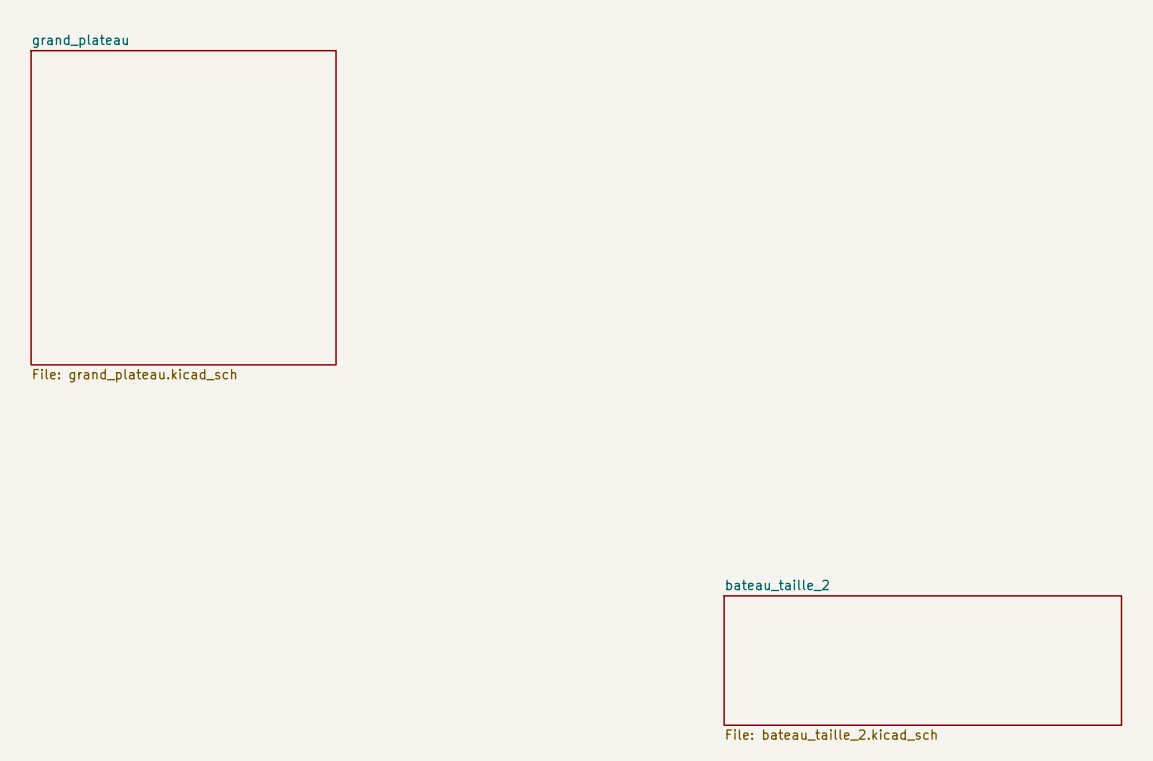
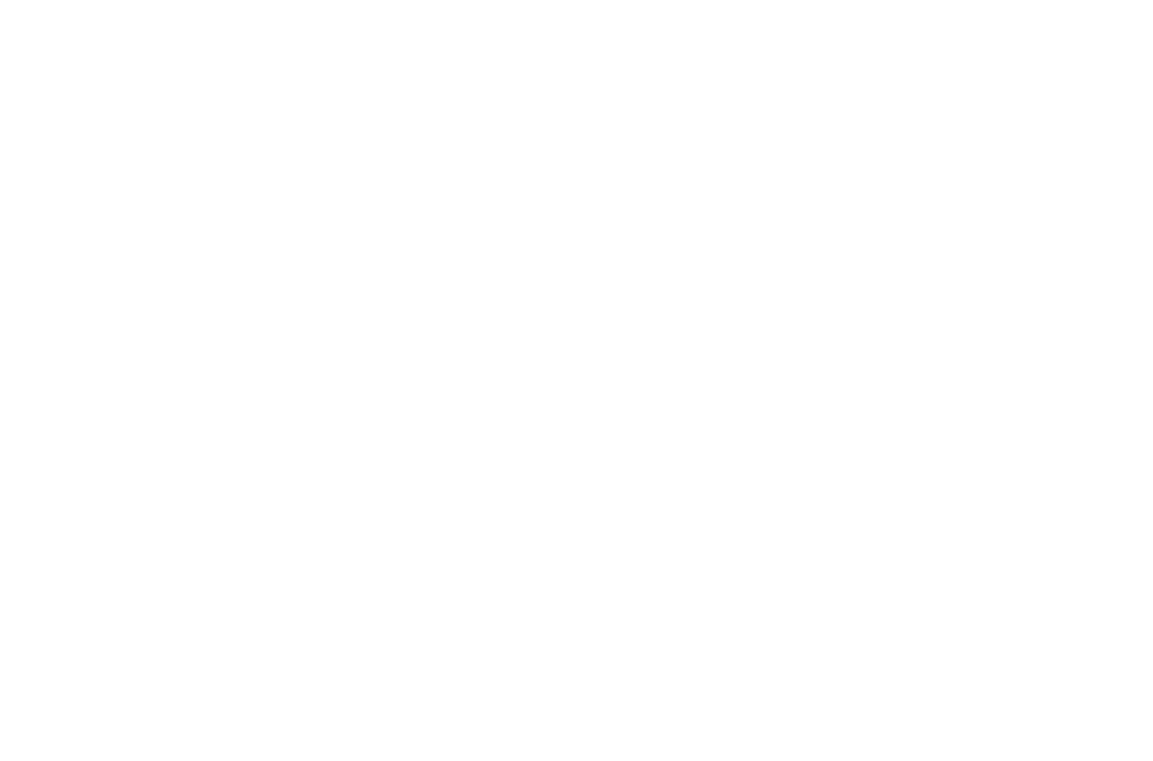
sheet grand_plateau: File: grand_plateau.kicad_sch (183, 207) -> none
sheet bateau_taille_2: File: bateau_taille_2.kicad_sch (922, 660) -> none

